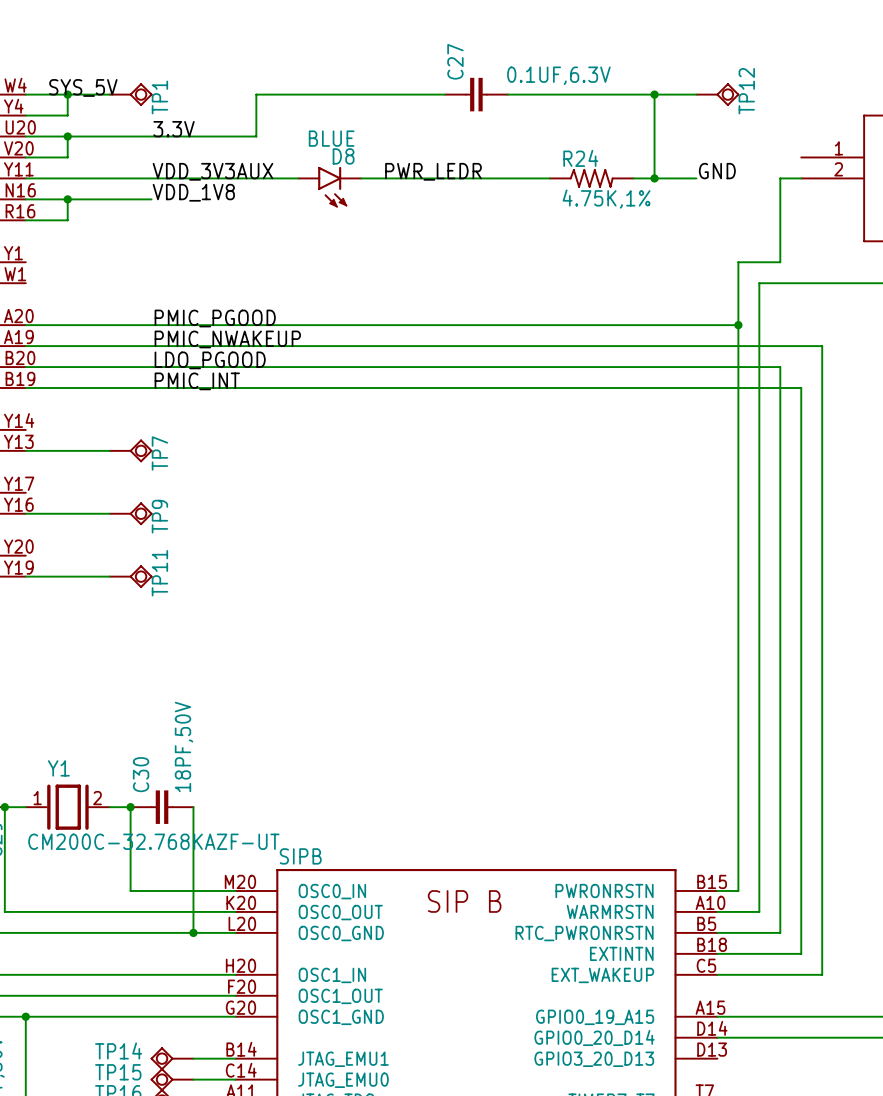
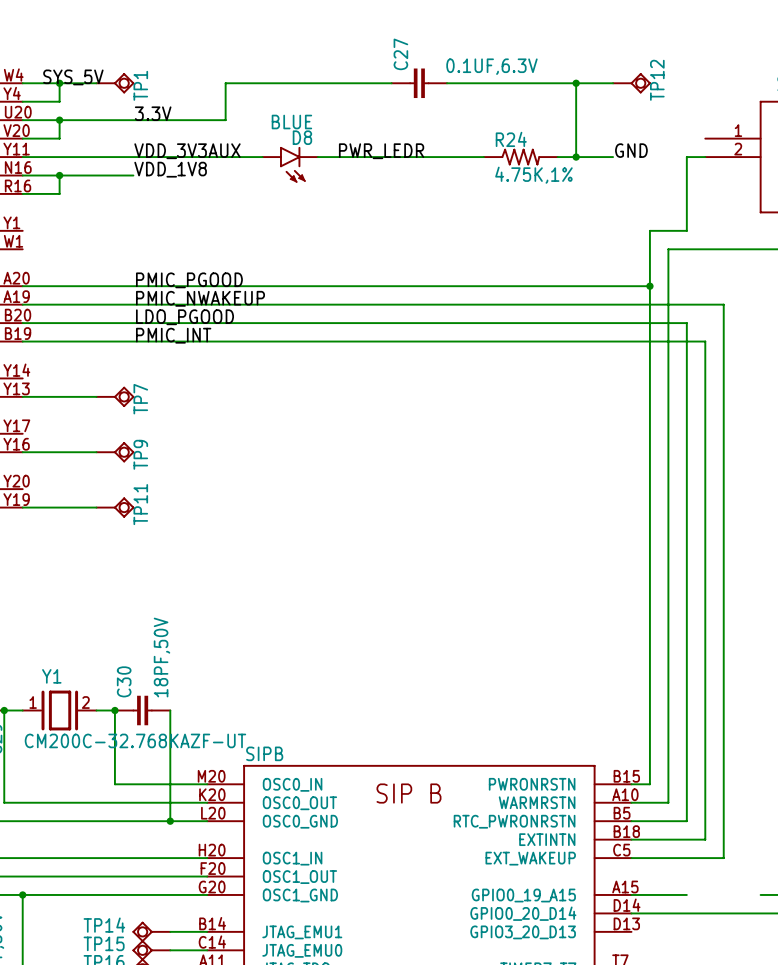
wire: (780, 1016) (864, 1016) -> none

